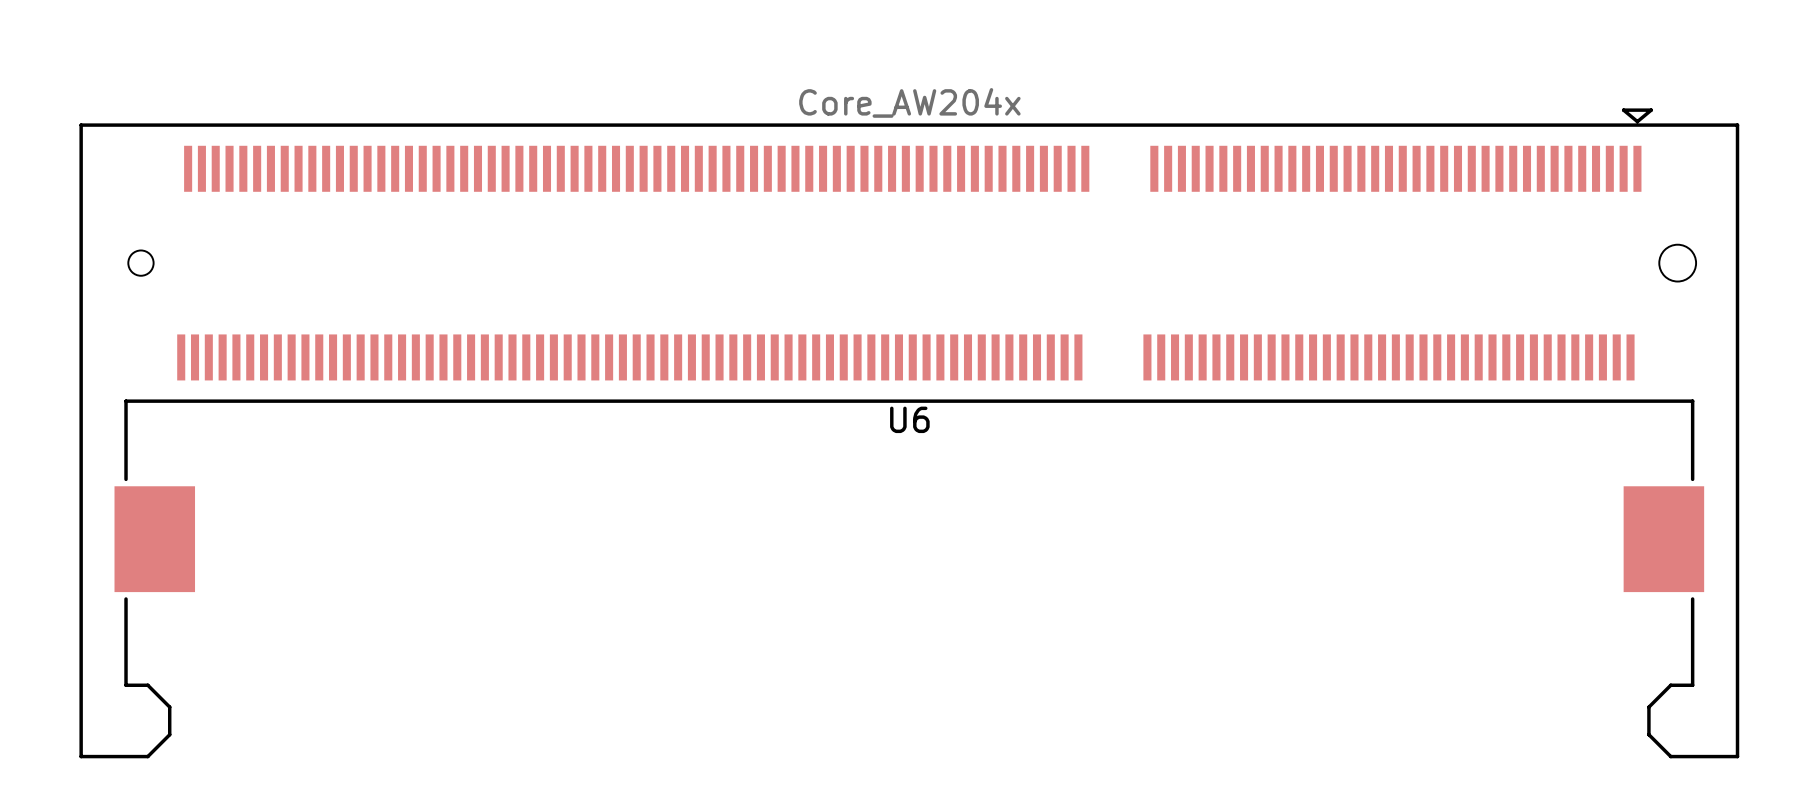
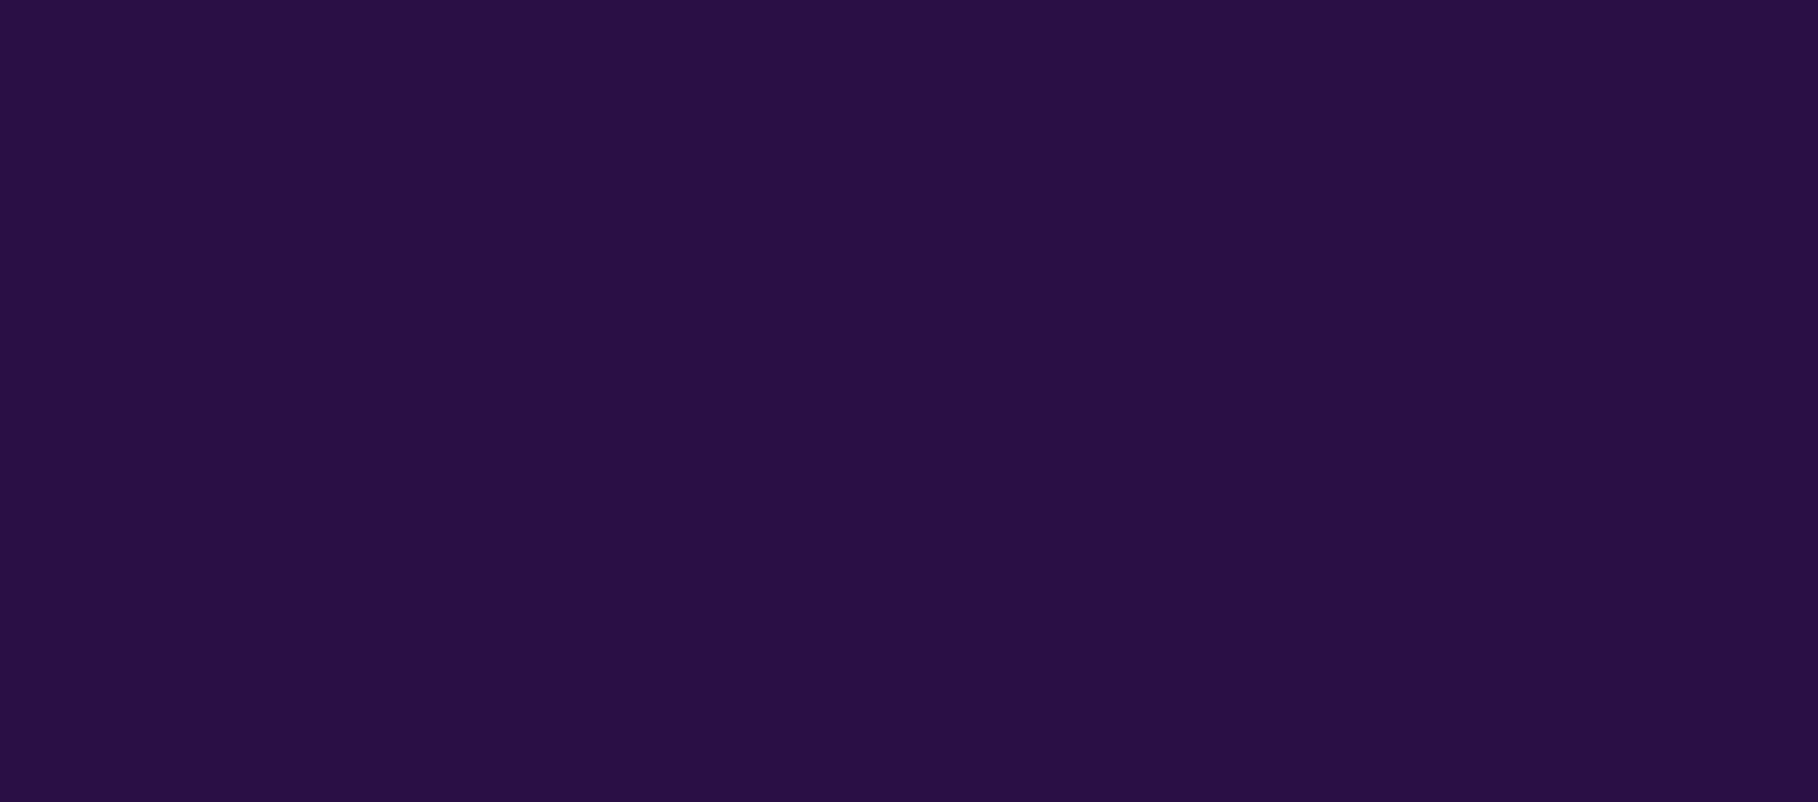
U6: Core_AW204x (909, 433) -> none

